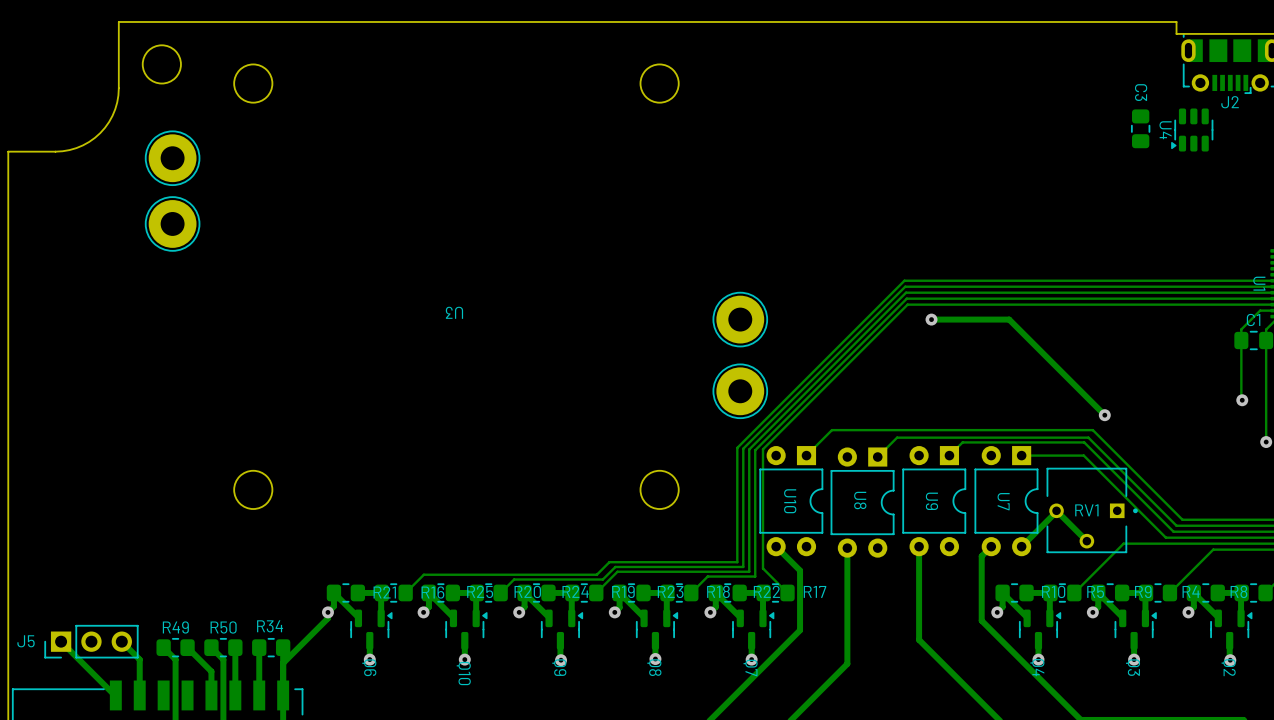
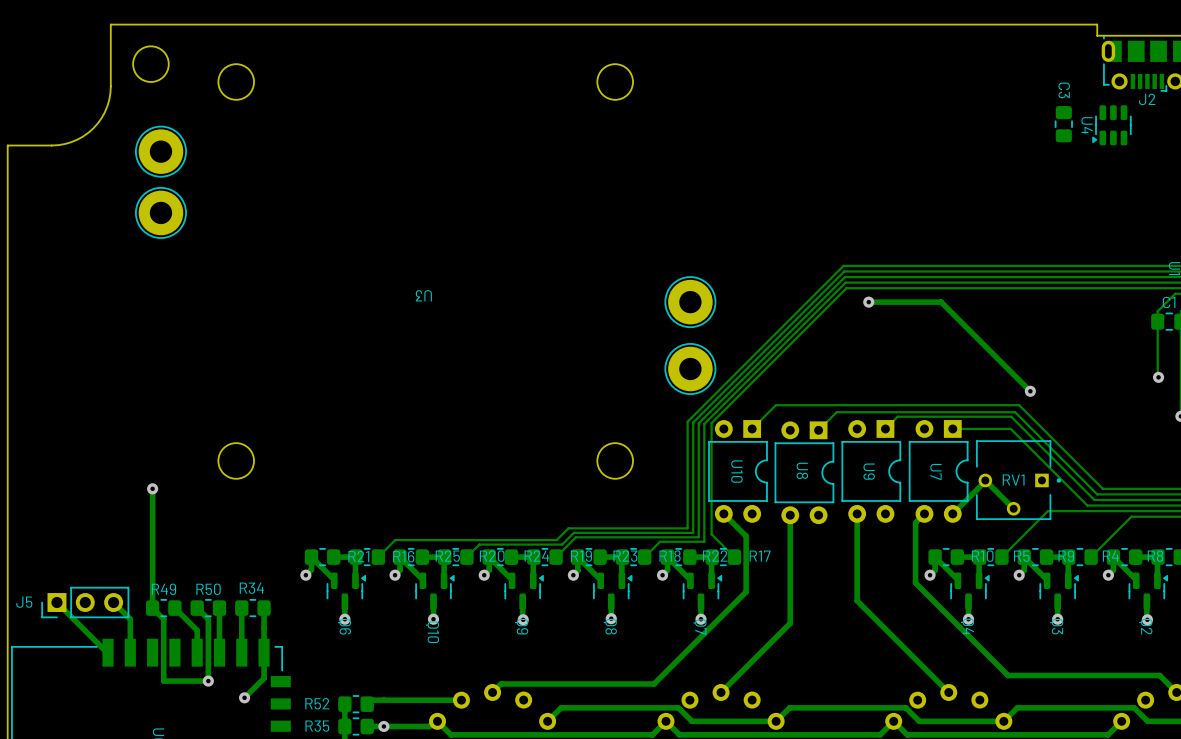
track: none -> (152, 488) (152, 608)
via: none -> (152, 488)
track: (327, 612) (327, 618) (283, 663) -> none

